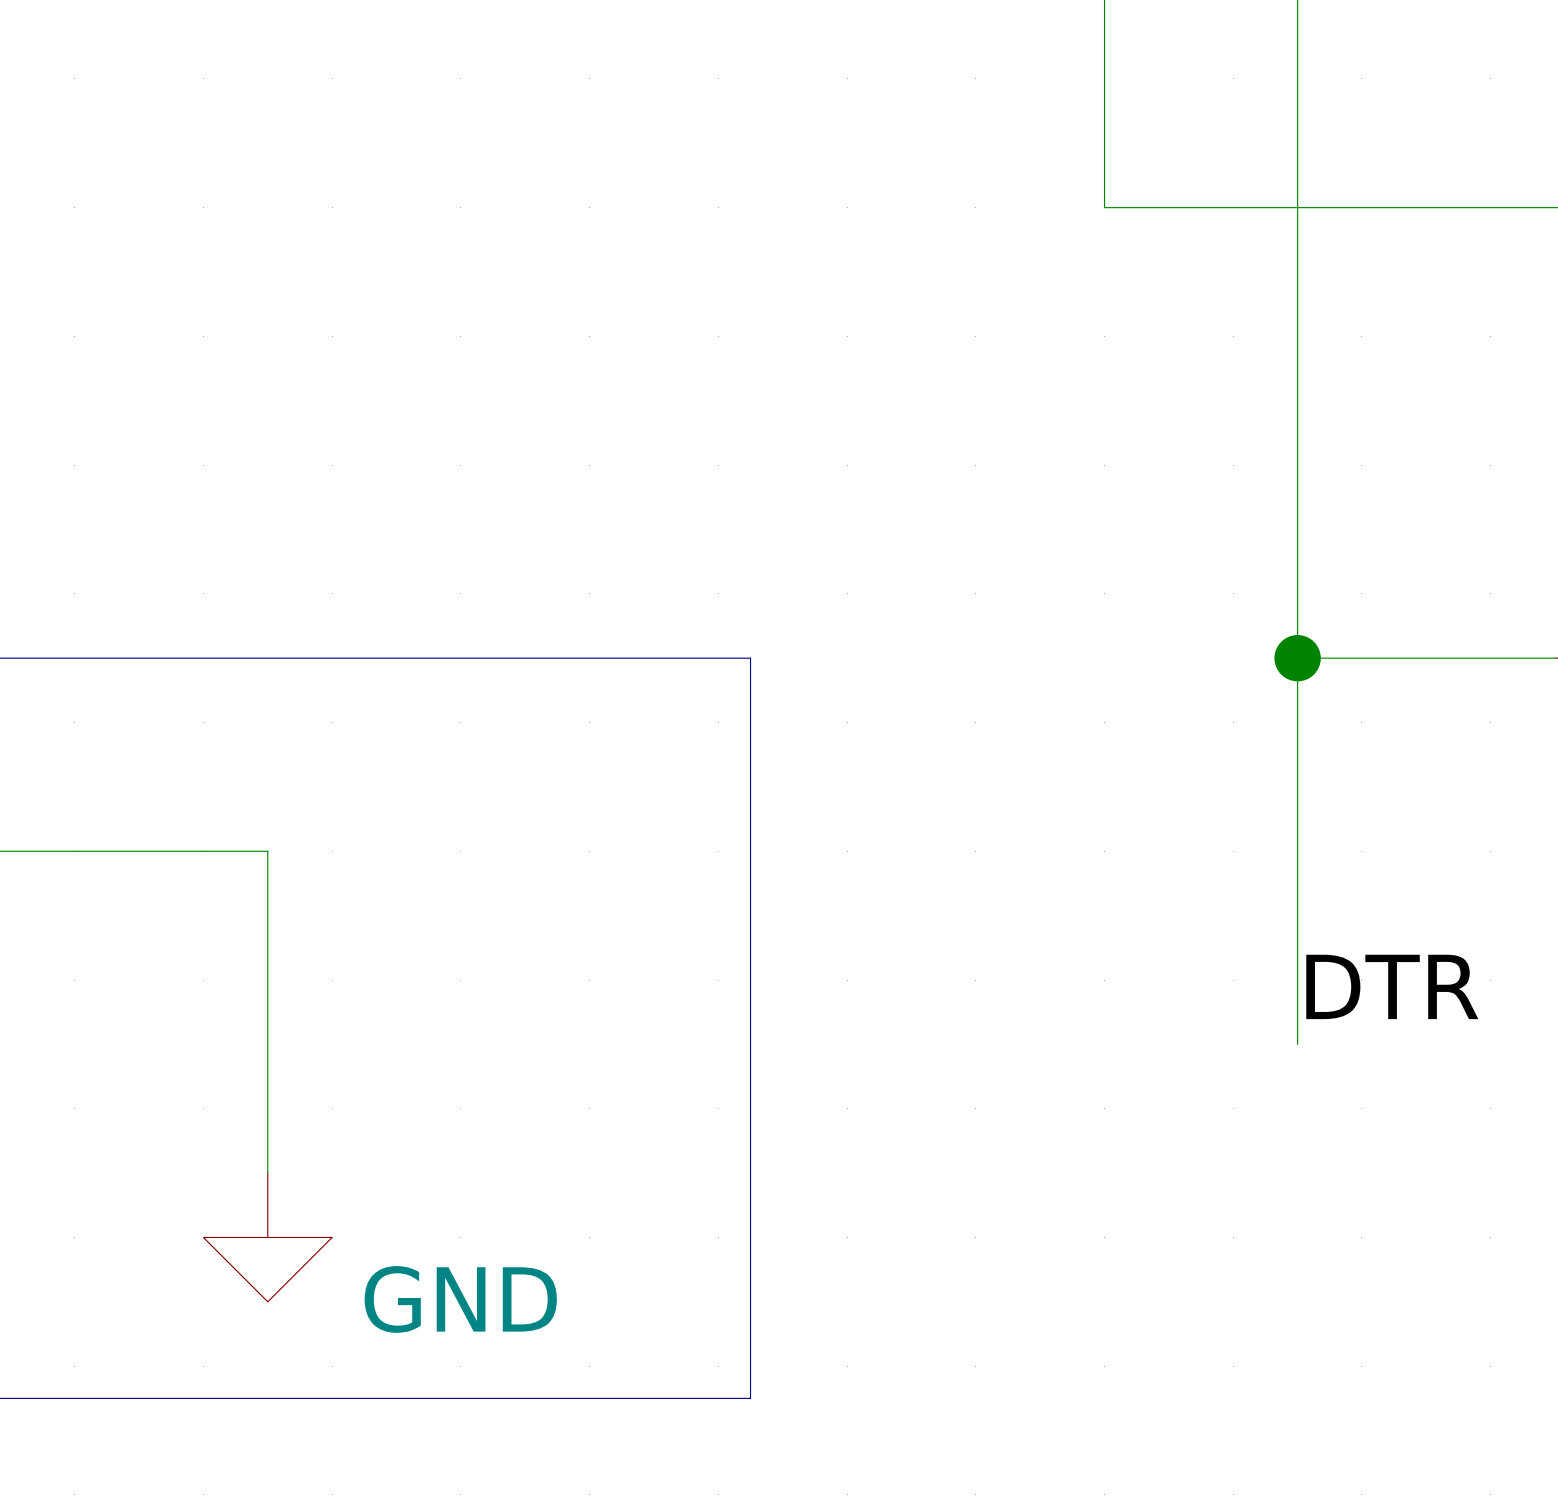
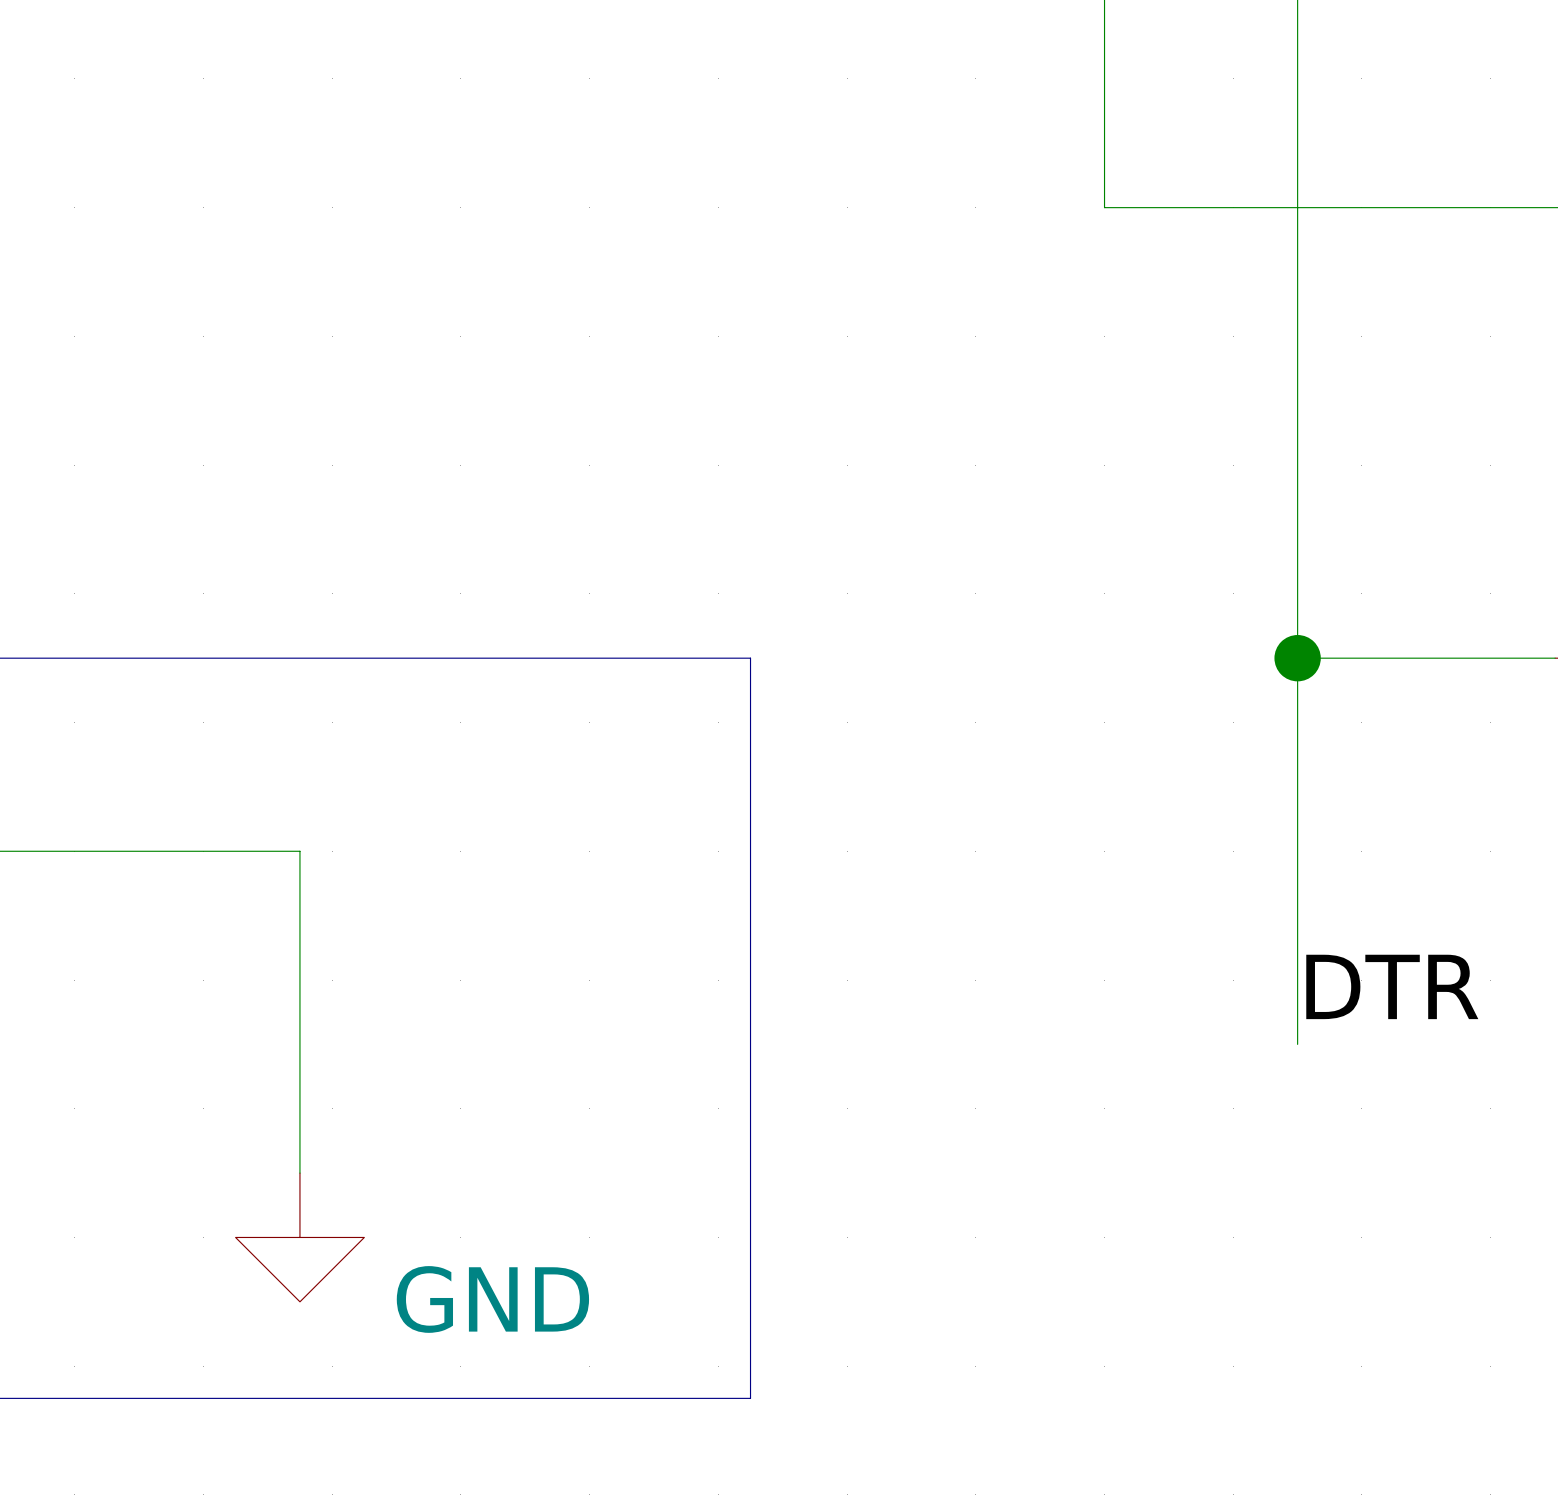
wire: (267, 851) (267, 1173) -> (267, 851) (299, 851) (299, 1173)
power symbol position: GND (267, 1237) -> GND (299, 1237)

